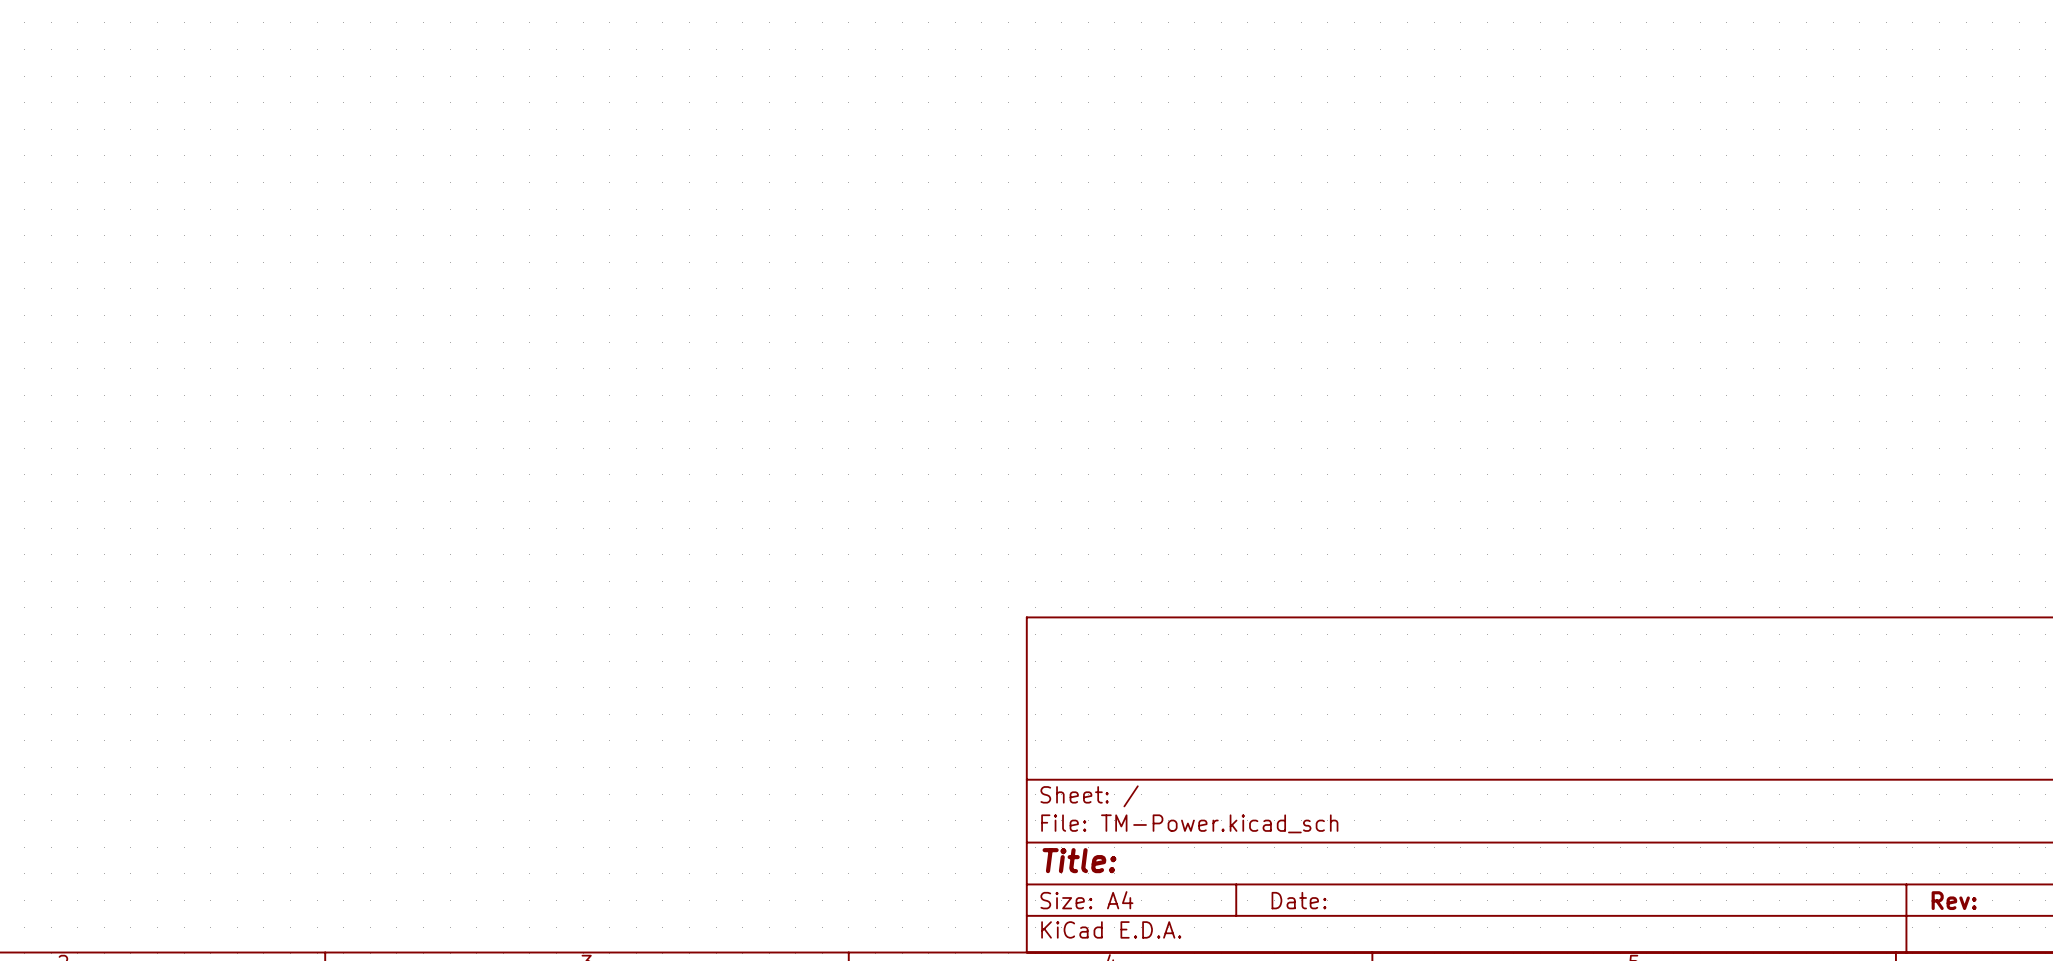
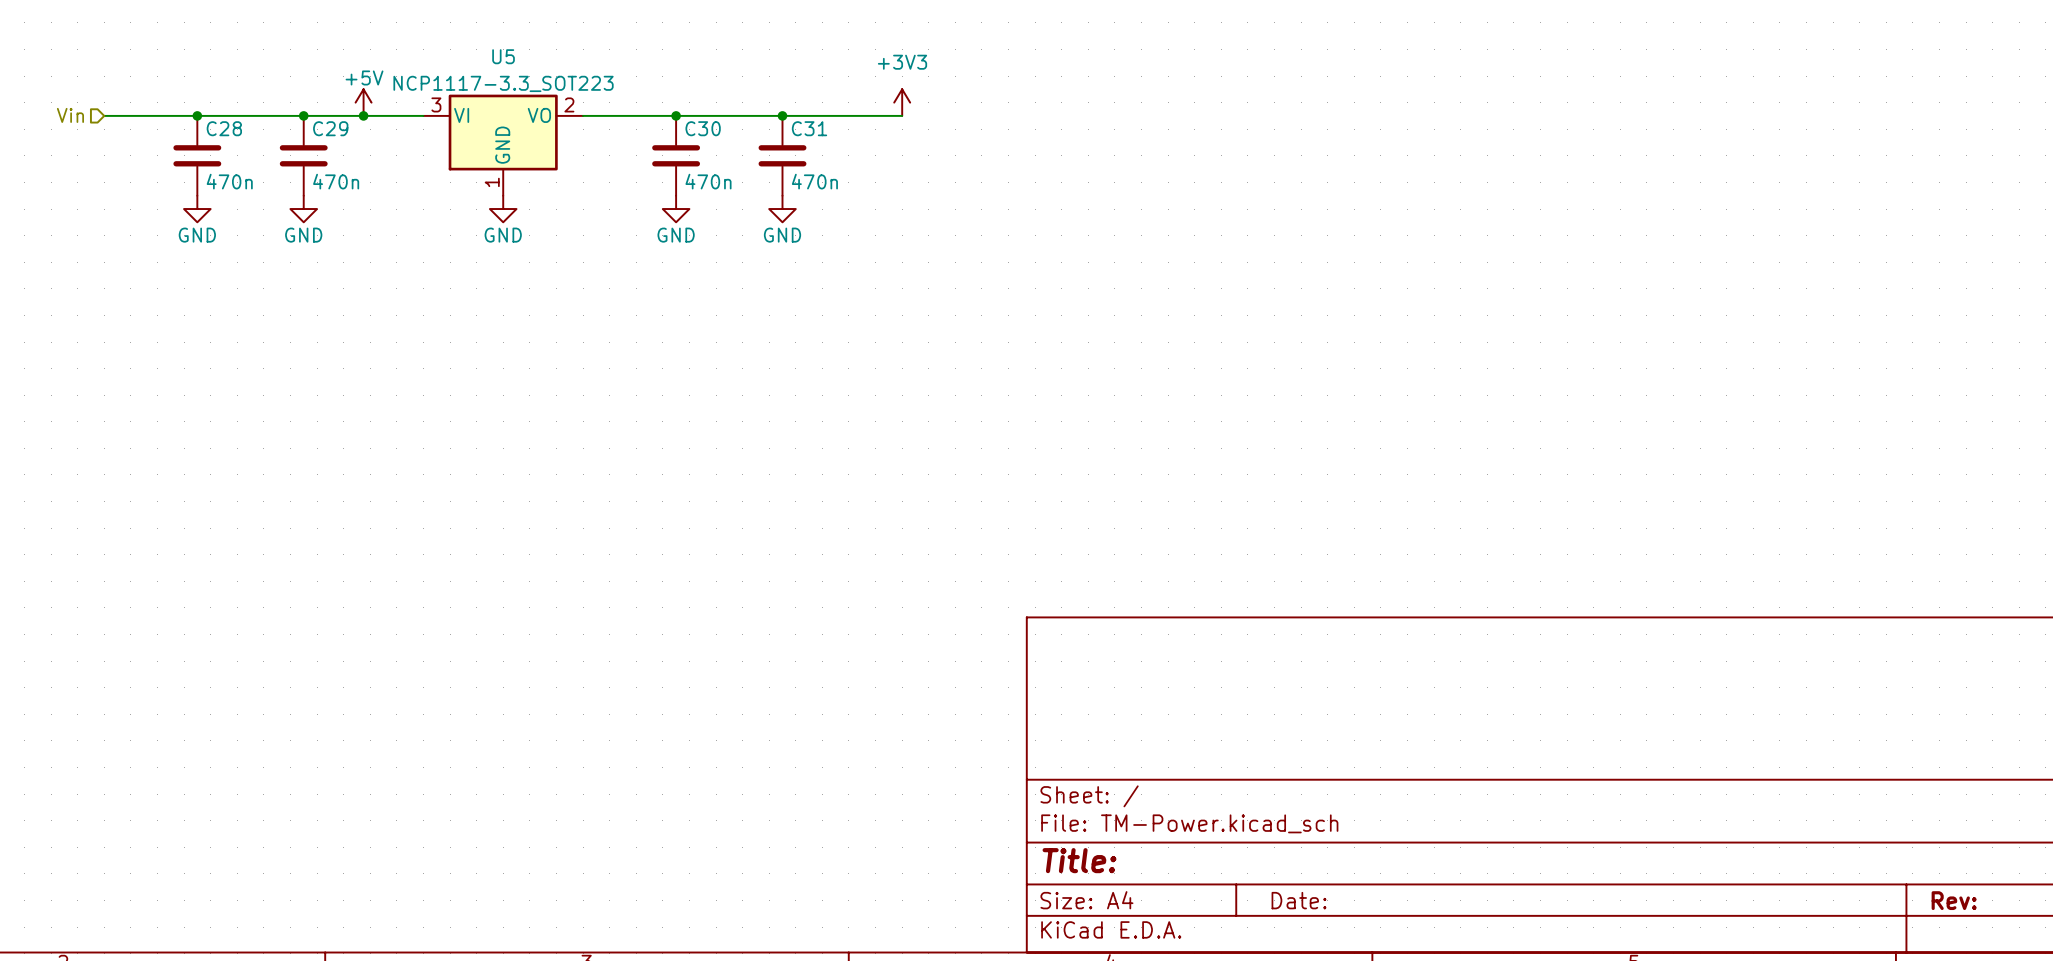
power symbol: none -> +5V (363, 102)
power symbol: none -> +3V3 (902, 102)
hierarchical label: none -> Vin (70, 115)
wire: none -> (104, 115) (423, 115)
junction: none -> (197, 115)
junction: none -> (303, 115)
junction: none -> (363, 115)
wire: none -> (583, 115) (902, 115)
junction: none -> (676, 115)
junction: none -> (782, 115)
U5: none -> NCP1117-3.3_SOT223 (503, 145)
C28: none -> 470n (197, 155)
C29: none -> 470n (303, 155)
C30: none -> 470n (676, 155)
C31: none -> 470n (782, 155)
power symbol: none -> GND (197, 209)
power symbol: none -> GND (303, 209)
power symbol: none -> GND (503, 209)
power symbol: none -> GND (676, 209)
power symbol: none -> GND (782, 209)

